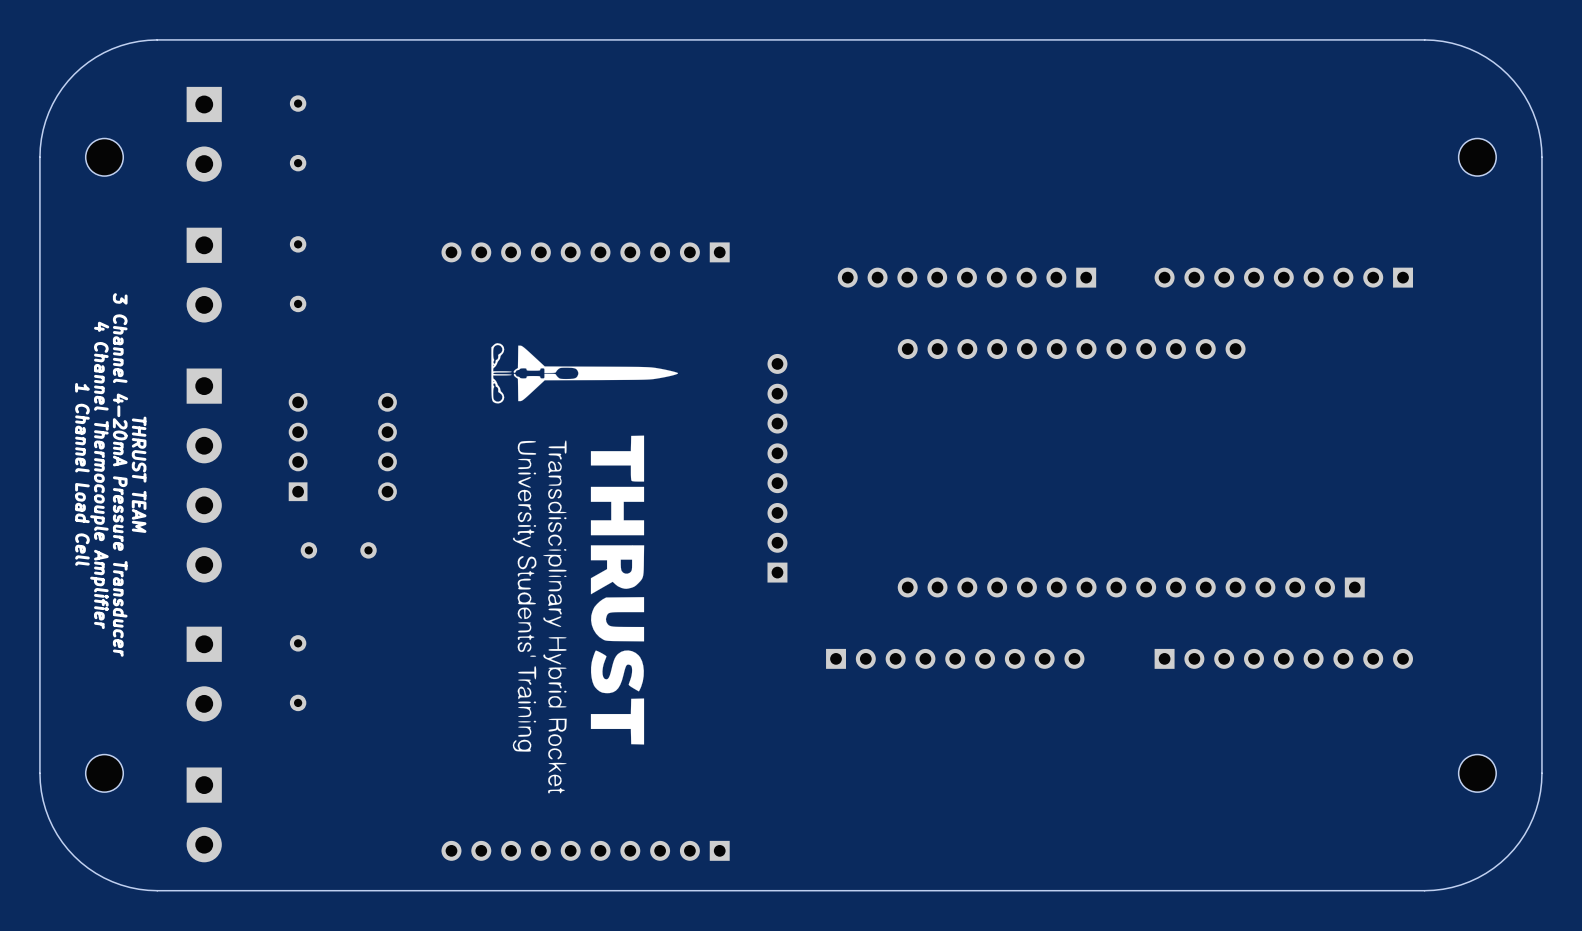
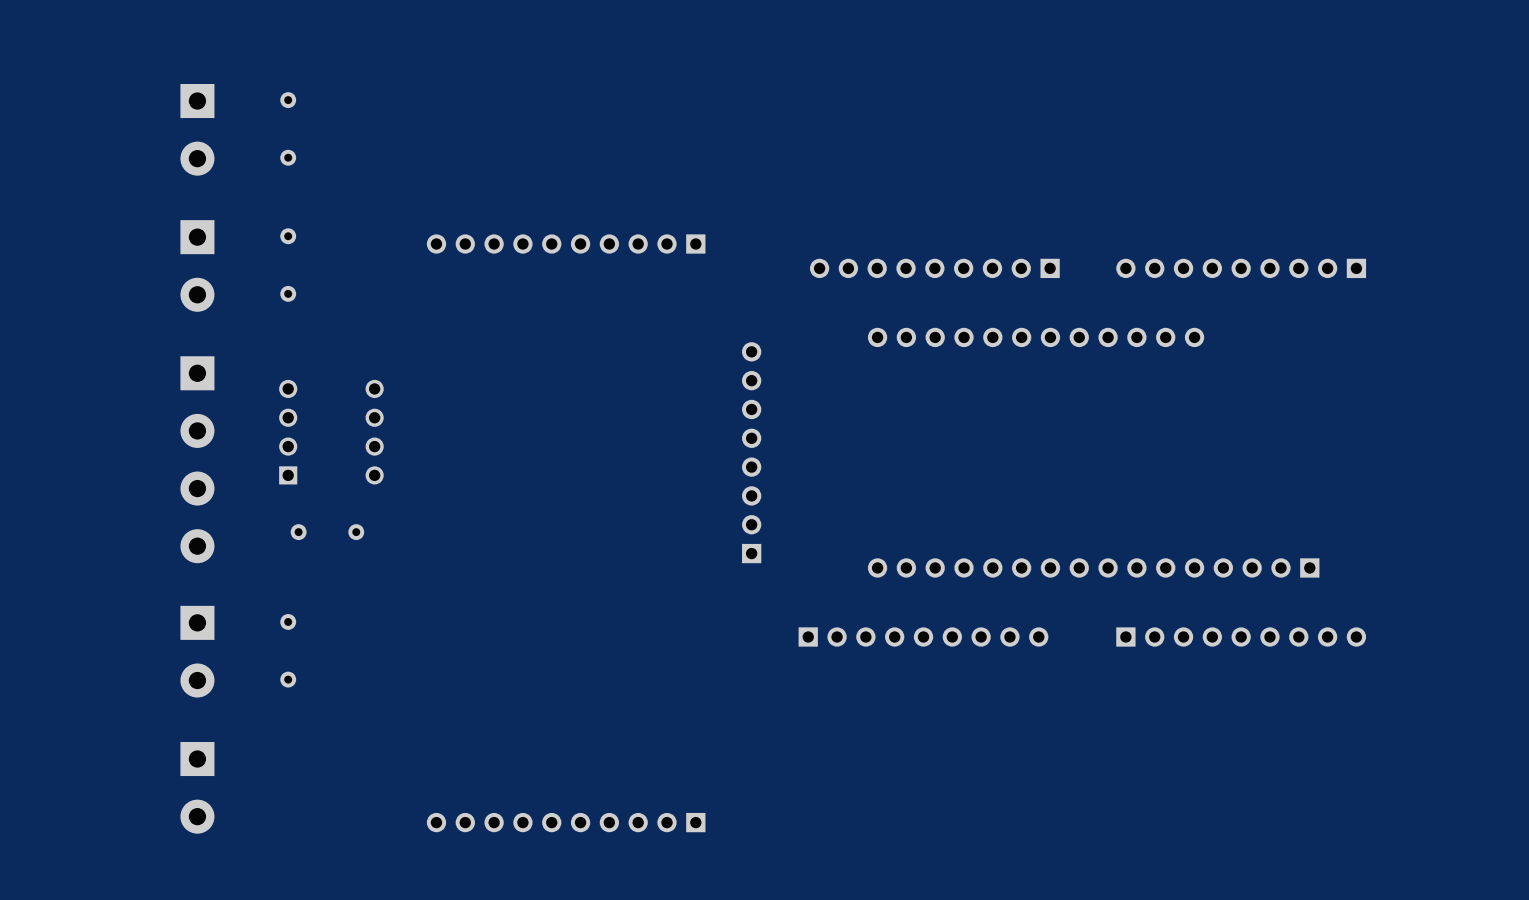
board edge: (1424, 39) (157, 39) (121, 45) (95, 57) (74, 74) (57, 95) (45, 121) (40, 148) (39, 773) (45, 809) (57, 834) (74, 856) (95, 873) (121, 884) (157, 890) (1424, 890) (1460, 884) (1485, 873) (1507, 856) (1524, 834) (1536, 809) (1541, 782) (1541, 148) (1533, 112) (1519, 88) (1507, 74) (1493, 62) (1469, 48) (1442, 41) (1424, 39) -> none
part: (104, 157) -> none
part: (1477, 157) -> none
drawing: [491, 343, 679, 794] -> none
text: 1 Channel Load Cell (82, 474) -> none
text: 3 Channel 4-20mA Pressure Transducer (120, 474) -> none
text: THRUST TEAM (139, 474) -> none
text: 4 Channel Thermocouple Amplifier (99, 475) -> none
part: (104, 773) -> none
part: (1477, 773) -> none

